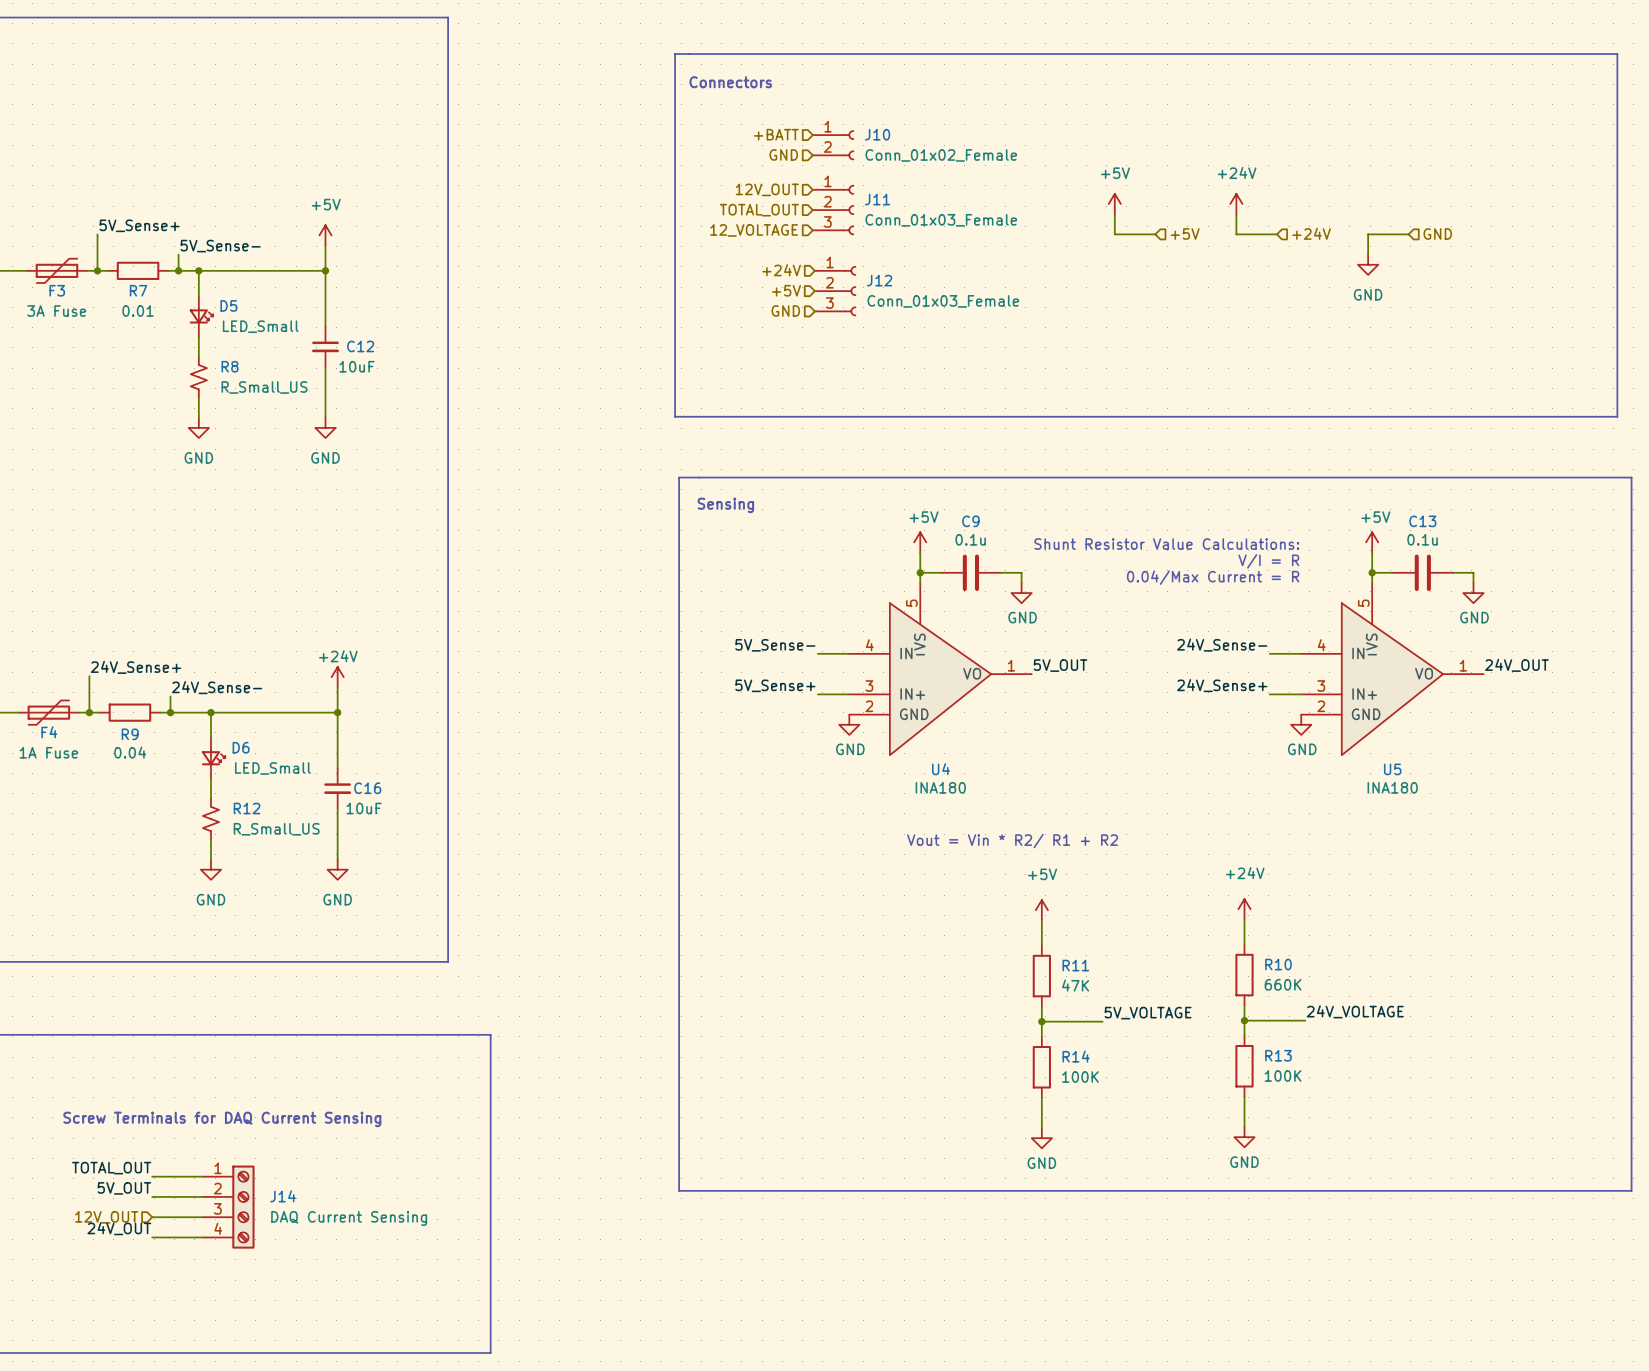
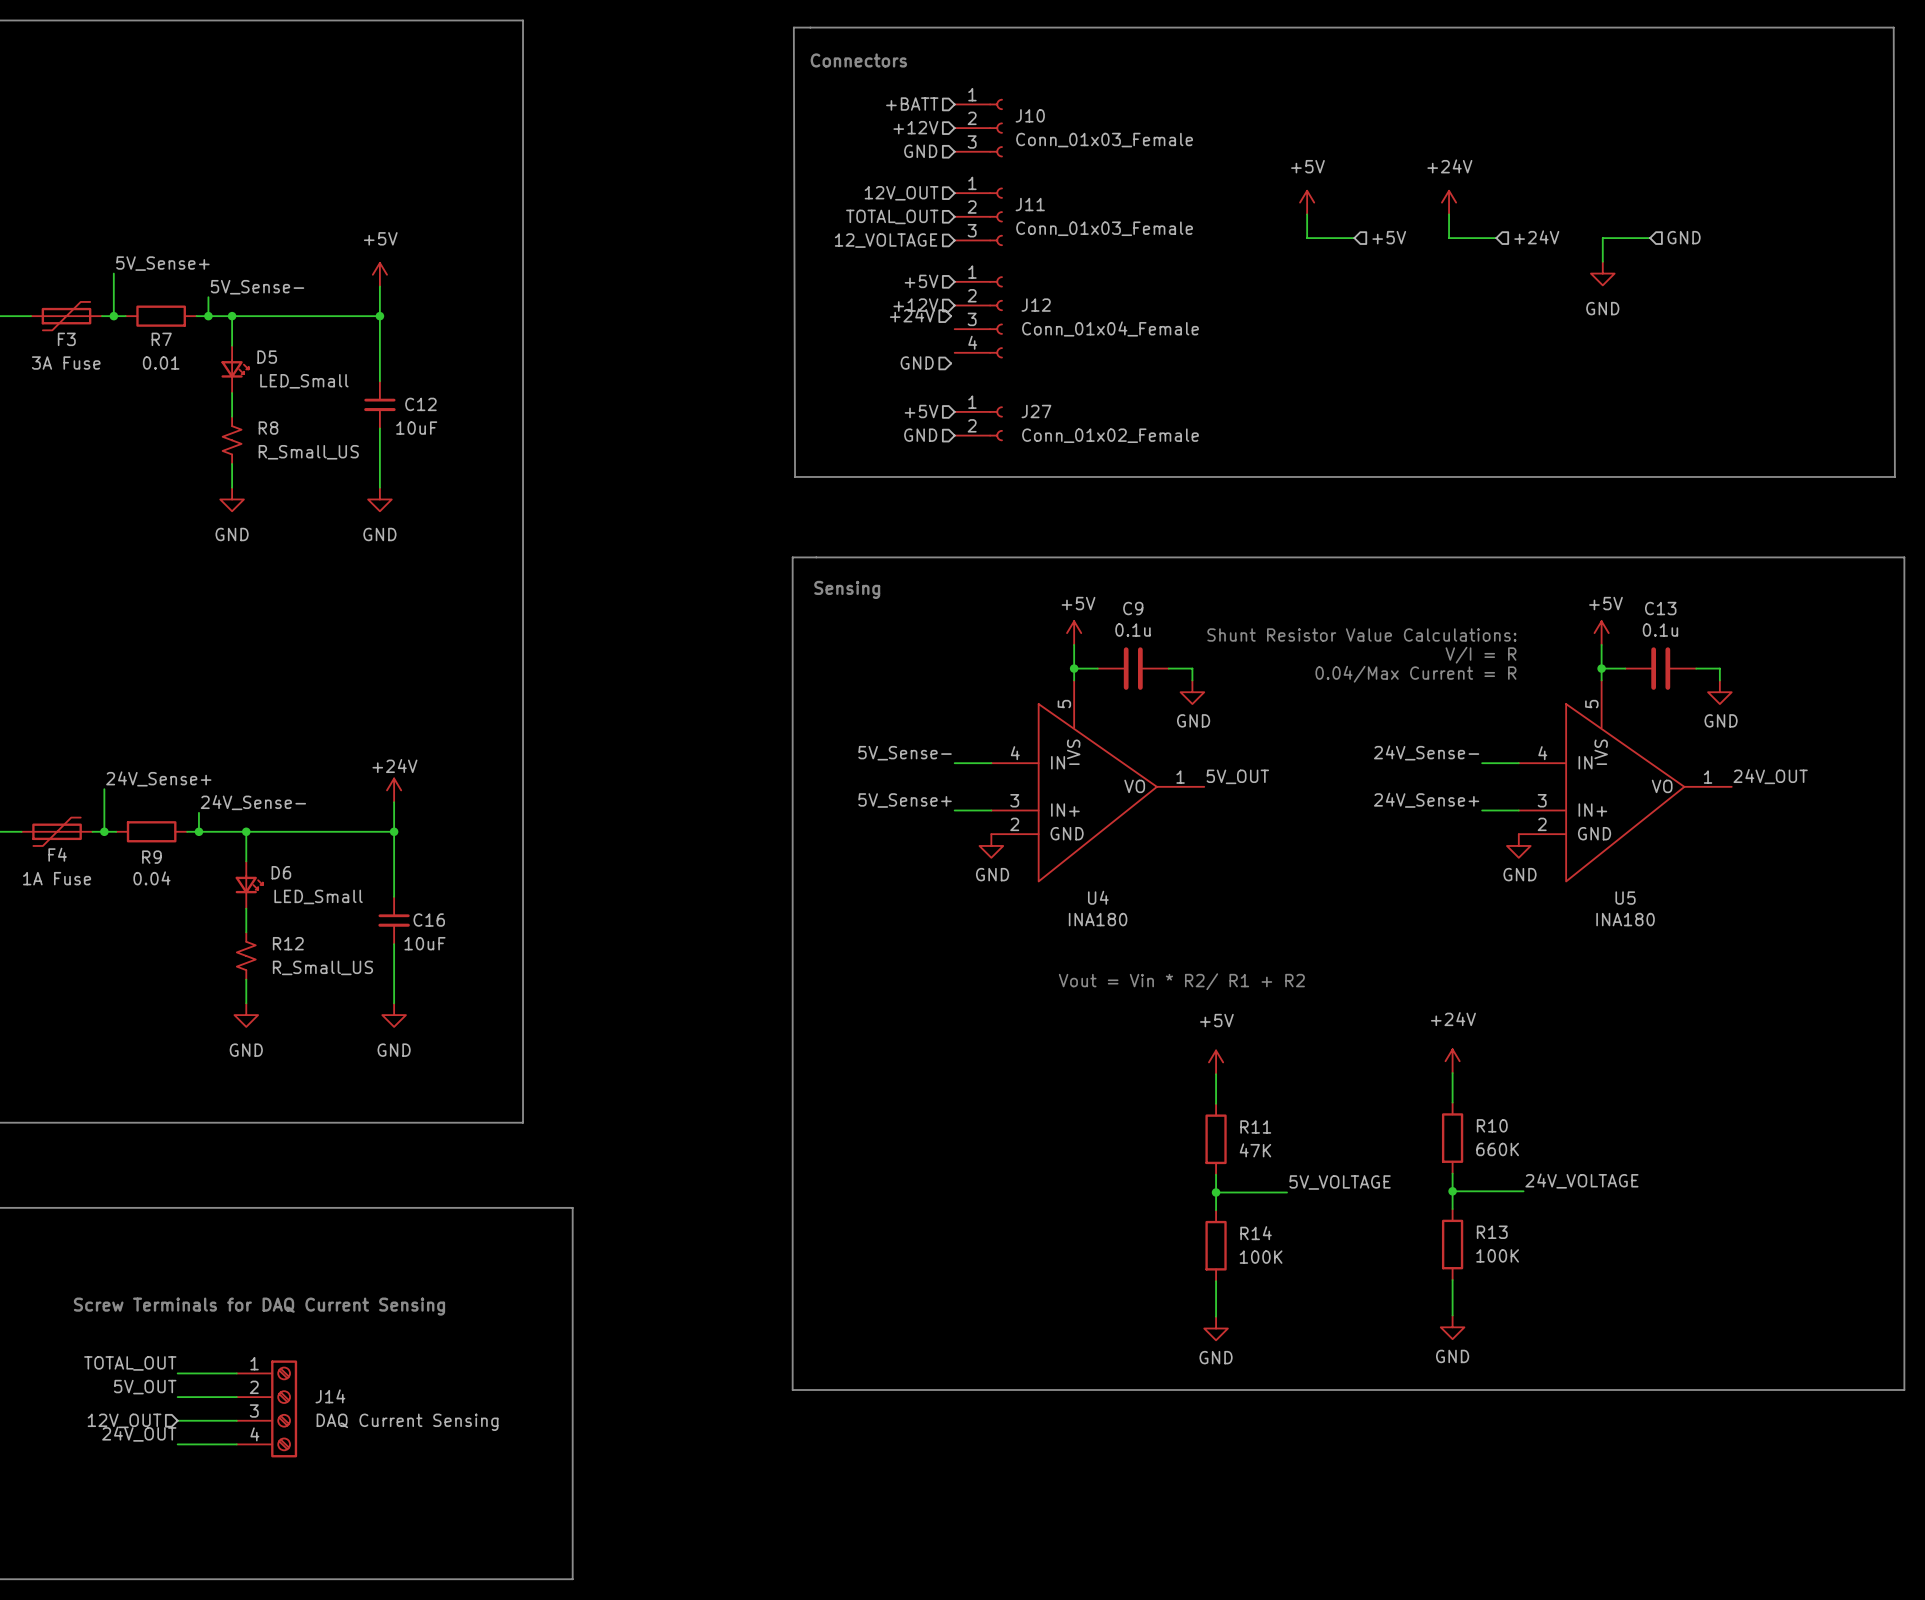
line: (675, 54) (1617, 54) (1617, 416) (675, 416) (675, 54) -> (793, 27) (795, 476) (1894, 476) (1893, 27) (793, 27)
text position: Connectors (730, 82) -> Connectors (858, 60)
hierarchical label: none -> +12V (915, 127)
J10 symbol: [812, 130, 855, 161] -> [954, 99, 1003, 158]
hierarchical label position: +BATT (776, 134) -> +BATT (912, 104)
hierarchical label position: GND (783, 154) -> GND (920, 151)
J10 value: Conn_01x02_Female (941, 155) -> Conn_01x03_Female (1104, 140)
hierarchical label position: 12V_OUT (767, 189) -> 12V_OUT (901, 193)
power symbol position: +5V (1114, 203) -> +5V (1307, 202)
power symbol position: +24V (1236, 203) -> +24V (1449, 202)
hierarchical label position: TOTAL_OUT (759, 210) -> TOTAL_OUT (892, 216)
J11 position: (833, 210) -> (978, 216)
wire: (1114, 214) (1114, 234) (1155, 234) -> (1307, 214) (1307, 238) (1354, 238)
wire: (1236, 214) (1236, 234) (1276, 234) -> (1449, 214) (1449, 238) (1496, 238)
hierarchical label position: 12_VOLTAGE (754, 230) -> 12_VOLTAGE (886, 240)
hierarchical label position: +24V (1311, 233) -> +24V (1536, 237)
hierarchical label position: +5V (1185, 234) -> +5V (1389, 237)
wire: (1408, 234) (1368, 234) (1368, 254) -> (1650, 238) (1602, 238) (1602, 261)
hierarchical label position: GND (1437, 234) -> GND (1684, 237)
hierarchical label: none -> +5V (921, 281)
hierarchical label: none -> +12V (915, 305)
power symbol position: GND (1368, 264) -> GND (1602, 273)
J12 symbol: [814, 266, 857, 317] -> [954, 276, 1003, 359]
hierarchical label: +5V (786, 290) -> none
J12 value: Conn_01x03_Female (943, 301) -> Conn_01x04_Female (1110, 328)
hierarchical label: none -> +5V (921, 411)
J27: none -> Conn_01x02_Female (978, 423)
hierarchical label: none -> GND (920, 435)

